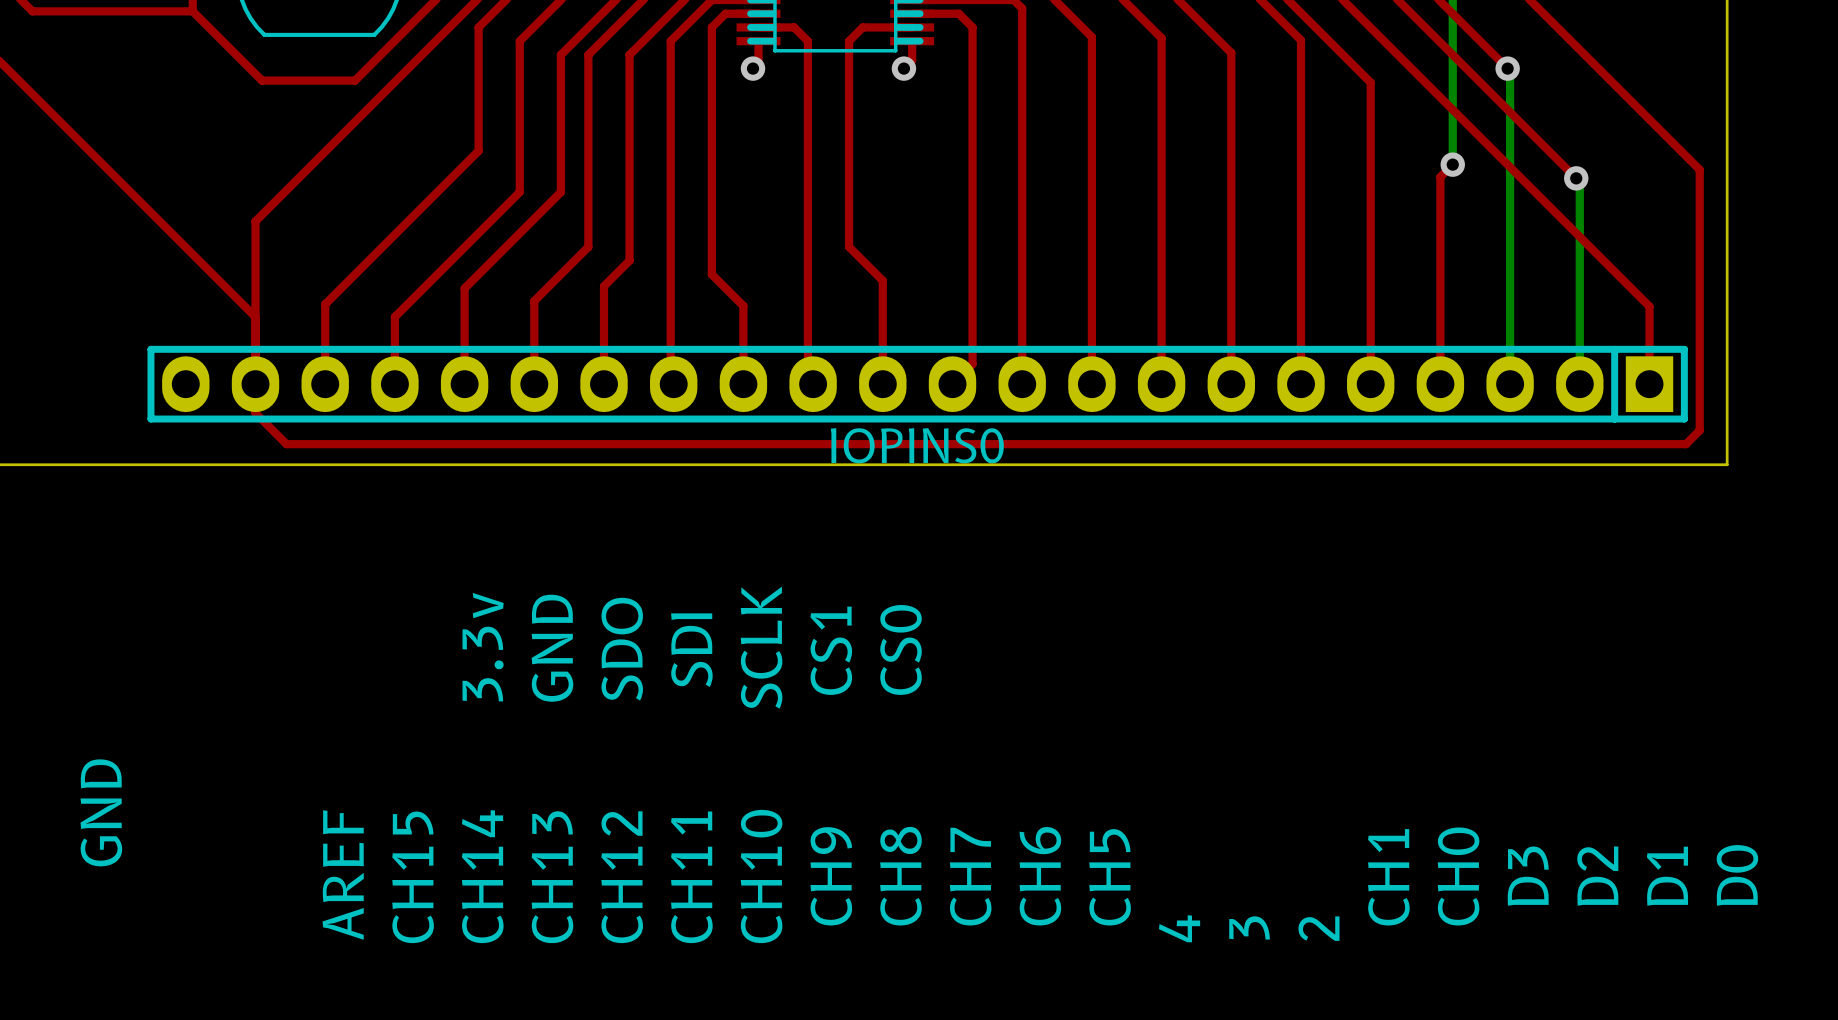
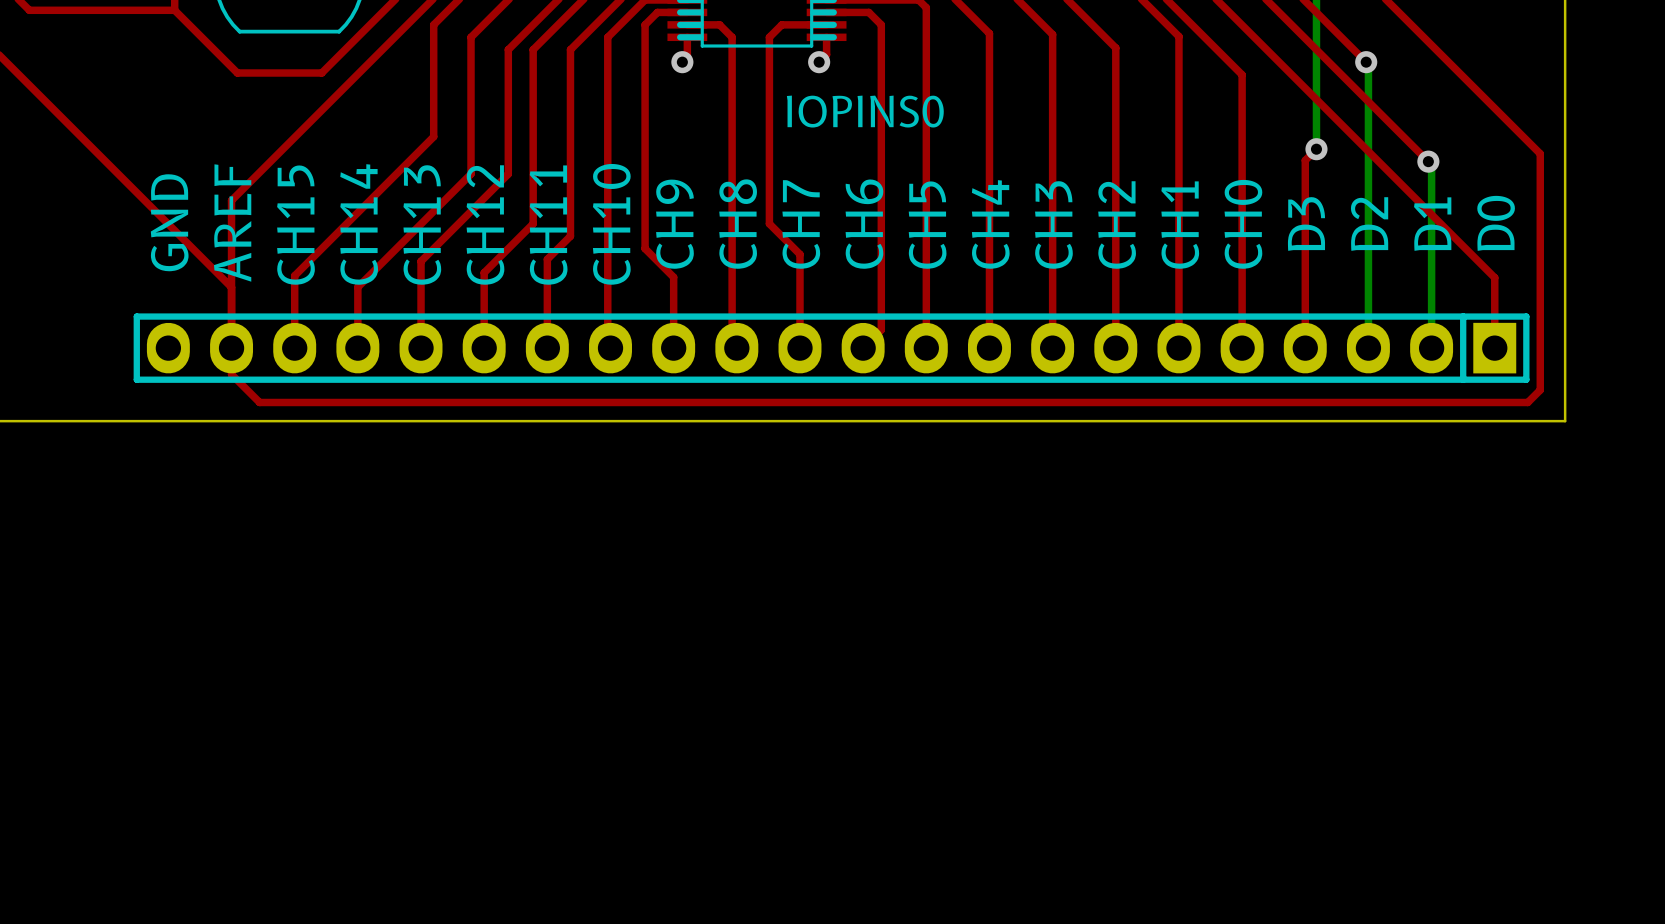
text: none -> GND (169, 222)
text: none -> CH4 (990, 224)
text: none -> CH3 (1053, 224)
text: none -> CH2 (1117, 225)
IOPINS0 name position: IOPINS0 (917, 445) -> IOPINS0 (865, 111)
text: 3.3v (483, 647) -> none
text: SCLK (761, 647) -> none
text: GND (552, 648) -> none
text: SDO (622, 649) -> none
text: CS0 (901, 649) -> none
text: SDI (691, 650) -> none
text: CS1 (831, 650) -> none
text: GND (101, 812) -> none
text position: AREF (343, 875) -> AREF (232, 223)
text position: D0 (1737, 875) -> D0 (1496, 223)
text position: CH14 (482, 876) -> CH14 (359, 224)
text position: CH10 (761, 876) -> CH10 (611, 224)
text position: CH9 (831, 876) -> CH9 (674, 224)
text position: CH8 (900, 876) -> CH8 (738, 224)
text position: CH7 (970, 876) -> CH7 (801, 224)
text position: CH6 (1040, 876) -> CH6 (864, 224)
text position: CH0 (1458, 876) -> CH0 (1243, 224)
text position: D3 (1528, 876) -> D3 (1306, 223)
text position: D2 (1597, 876) -> D2 (1369, 224)
text position: D1 (1667, 876) -> D1 (1432, 224)
text position: CH15 (413, 877) -> CH15 (296, 225)
text position: CH13 (552, 877) -> CH13 (422, 224)
text position: CH12 (622, 877) -> CH12 (485, 225)
text position: CH11 (691, 877) -> CH11 (548, 225)
text position: CH5 (1110, 877) -> CH5 (927, 225)
text position: CH1 (1388, 877) -> CH1 (1180, 225)
text: 3 (1249, 927) -> none
text: 4 (1179, 928) -> none
text: 2 (1319, 928) -> none

